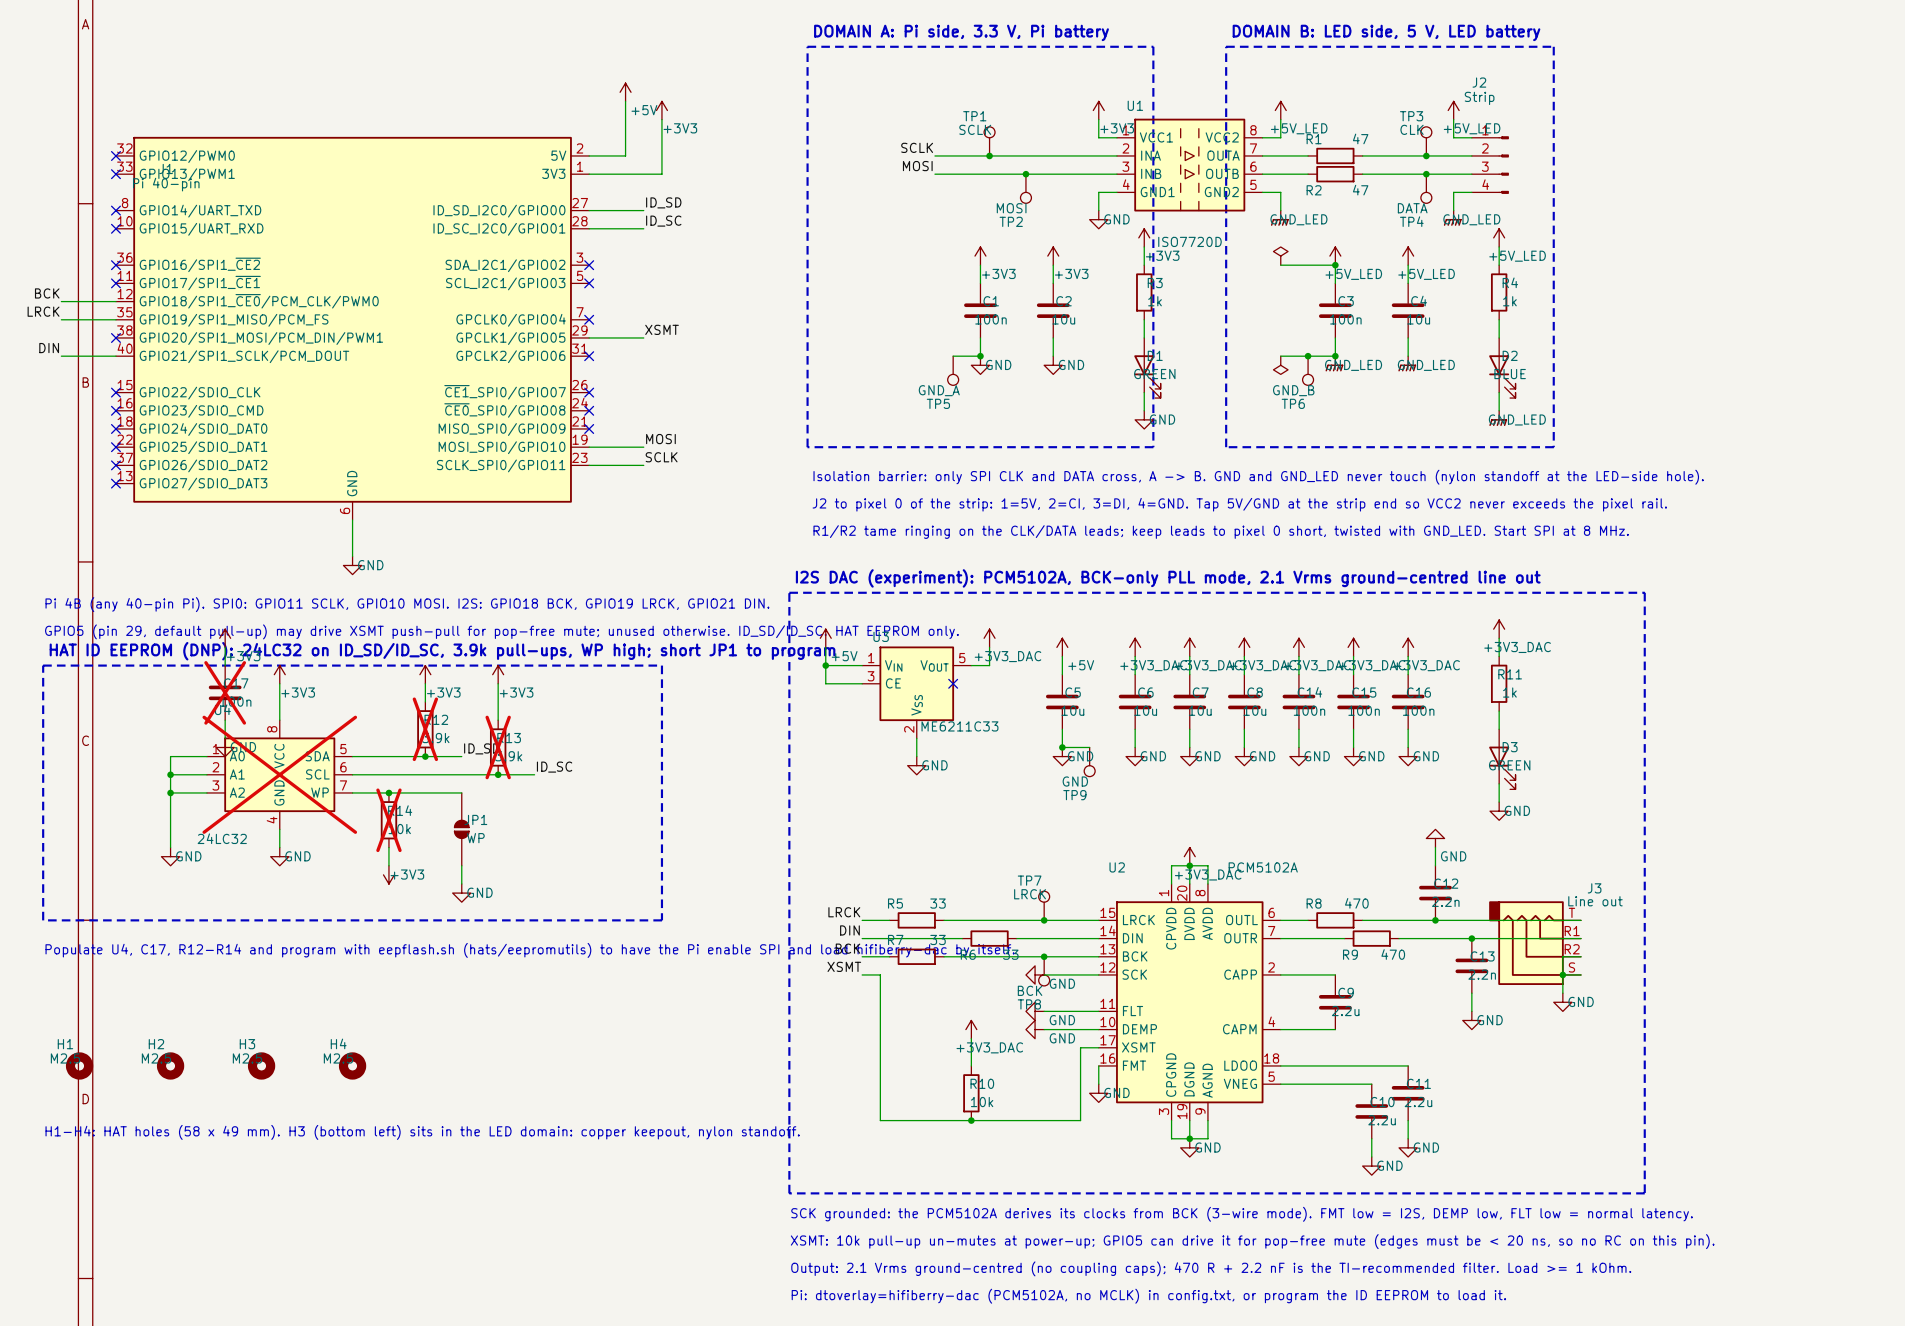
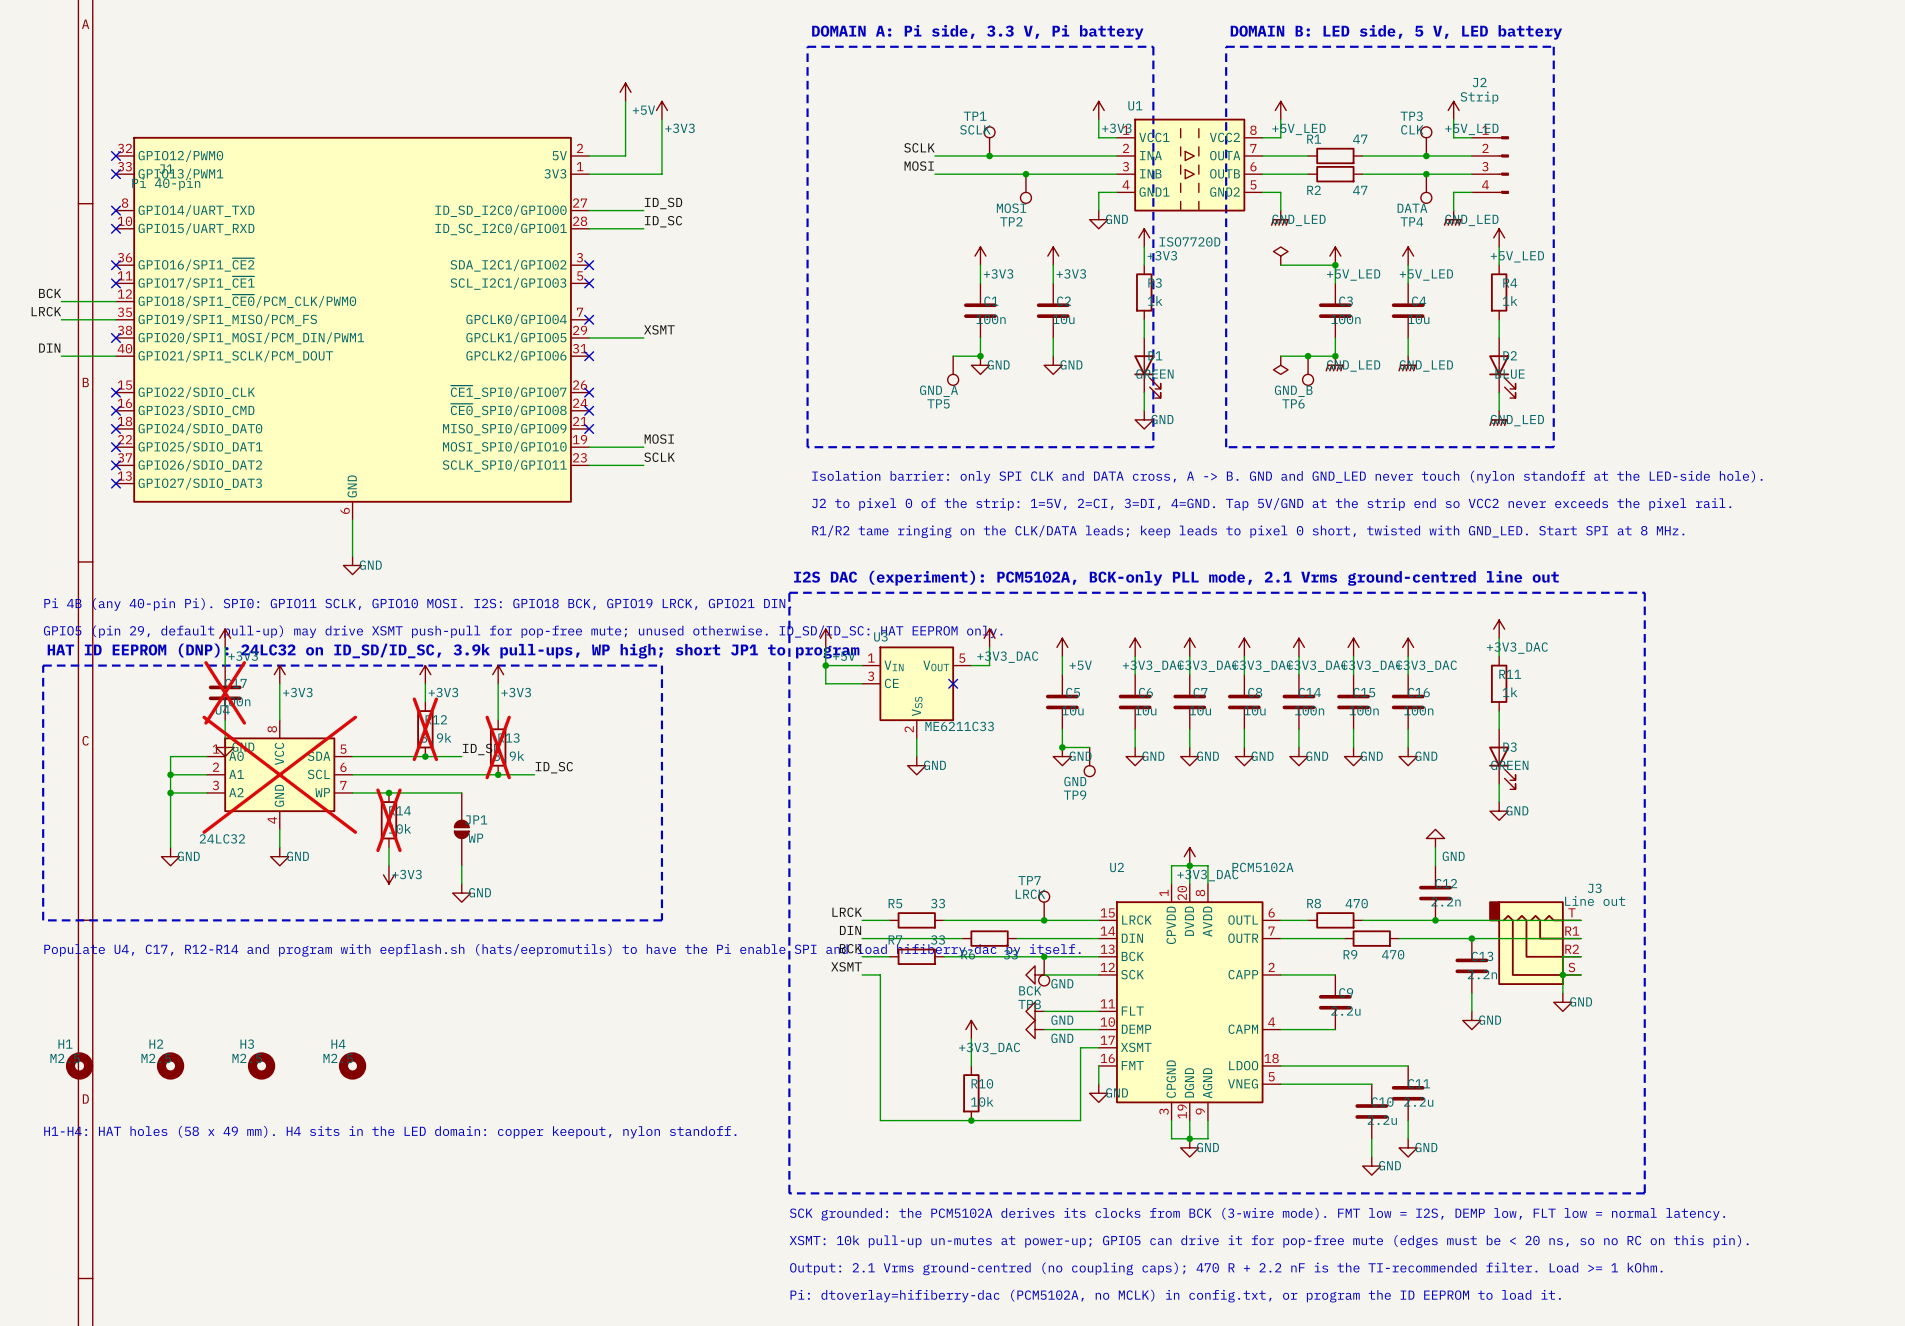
text: H1-H4: HAT holes (58 x 49 mm). H3 (bottom left) sits in the LED domain: copper keepout, nylon standoff. (422, 1132) -> H1-H4: HAT holes (58 x 49 mm). H4 sits in the LED domain: copper keepout, nylon standoff. (390, 1132)

